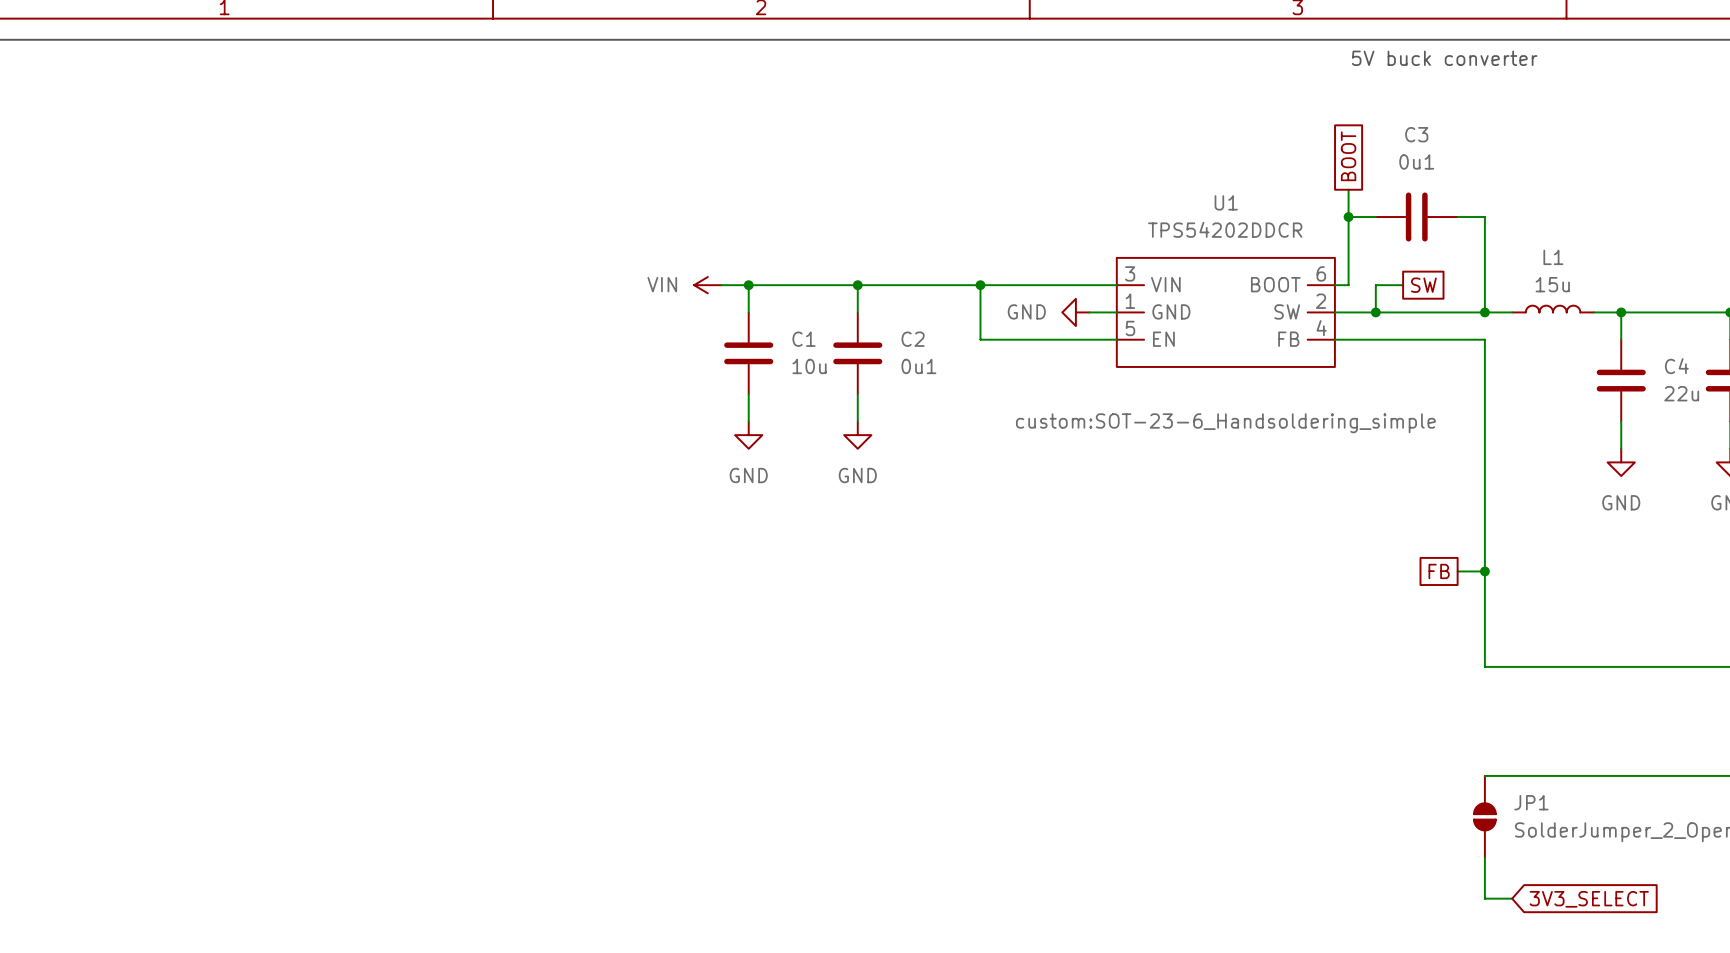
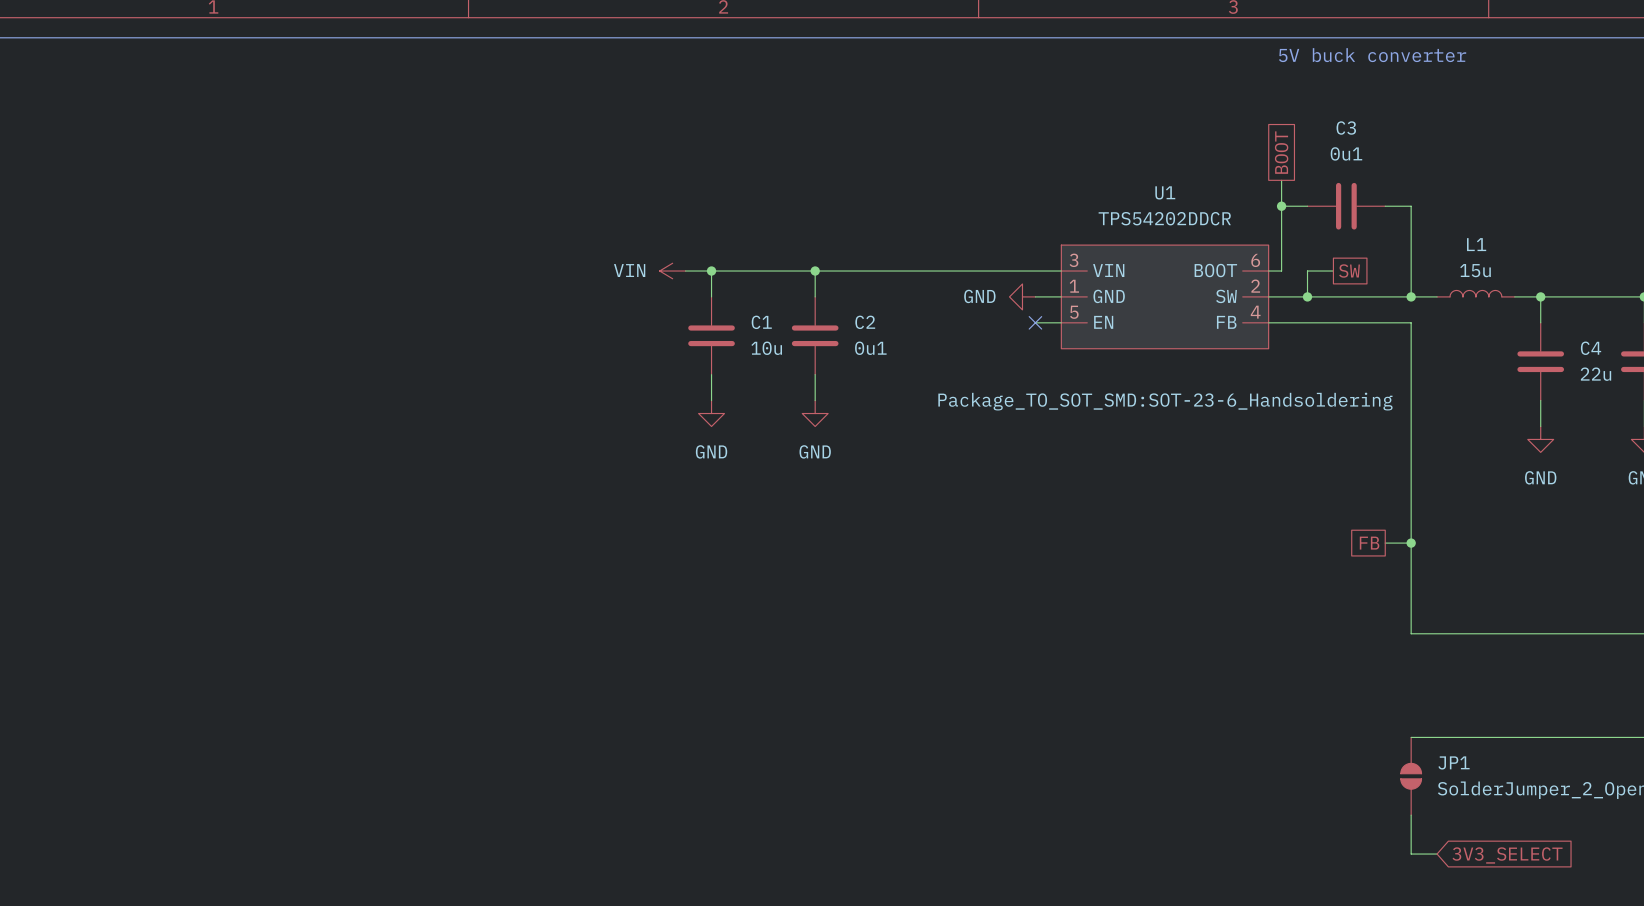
wire: (980, 285) (980, 339) (1089, 339) -> none
junction: (980, 285) -> none
no-connect mark: none -> (1035, 322)
U1 text: custom:SOT-23-6_Handsoldering_simple (1225, 423) -> Package_TO_SOT_SMD:SOT-23-6_Handsoldering (1165, 401)

